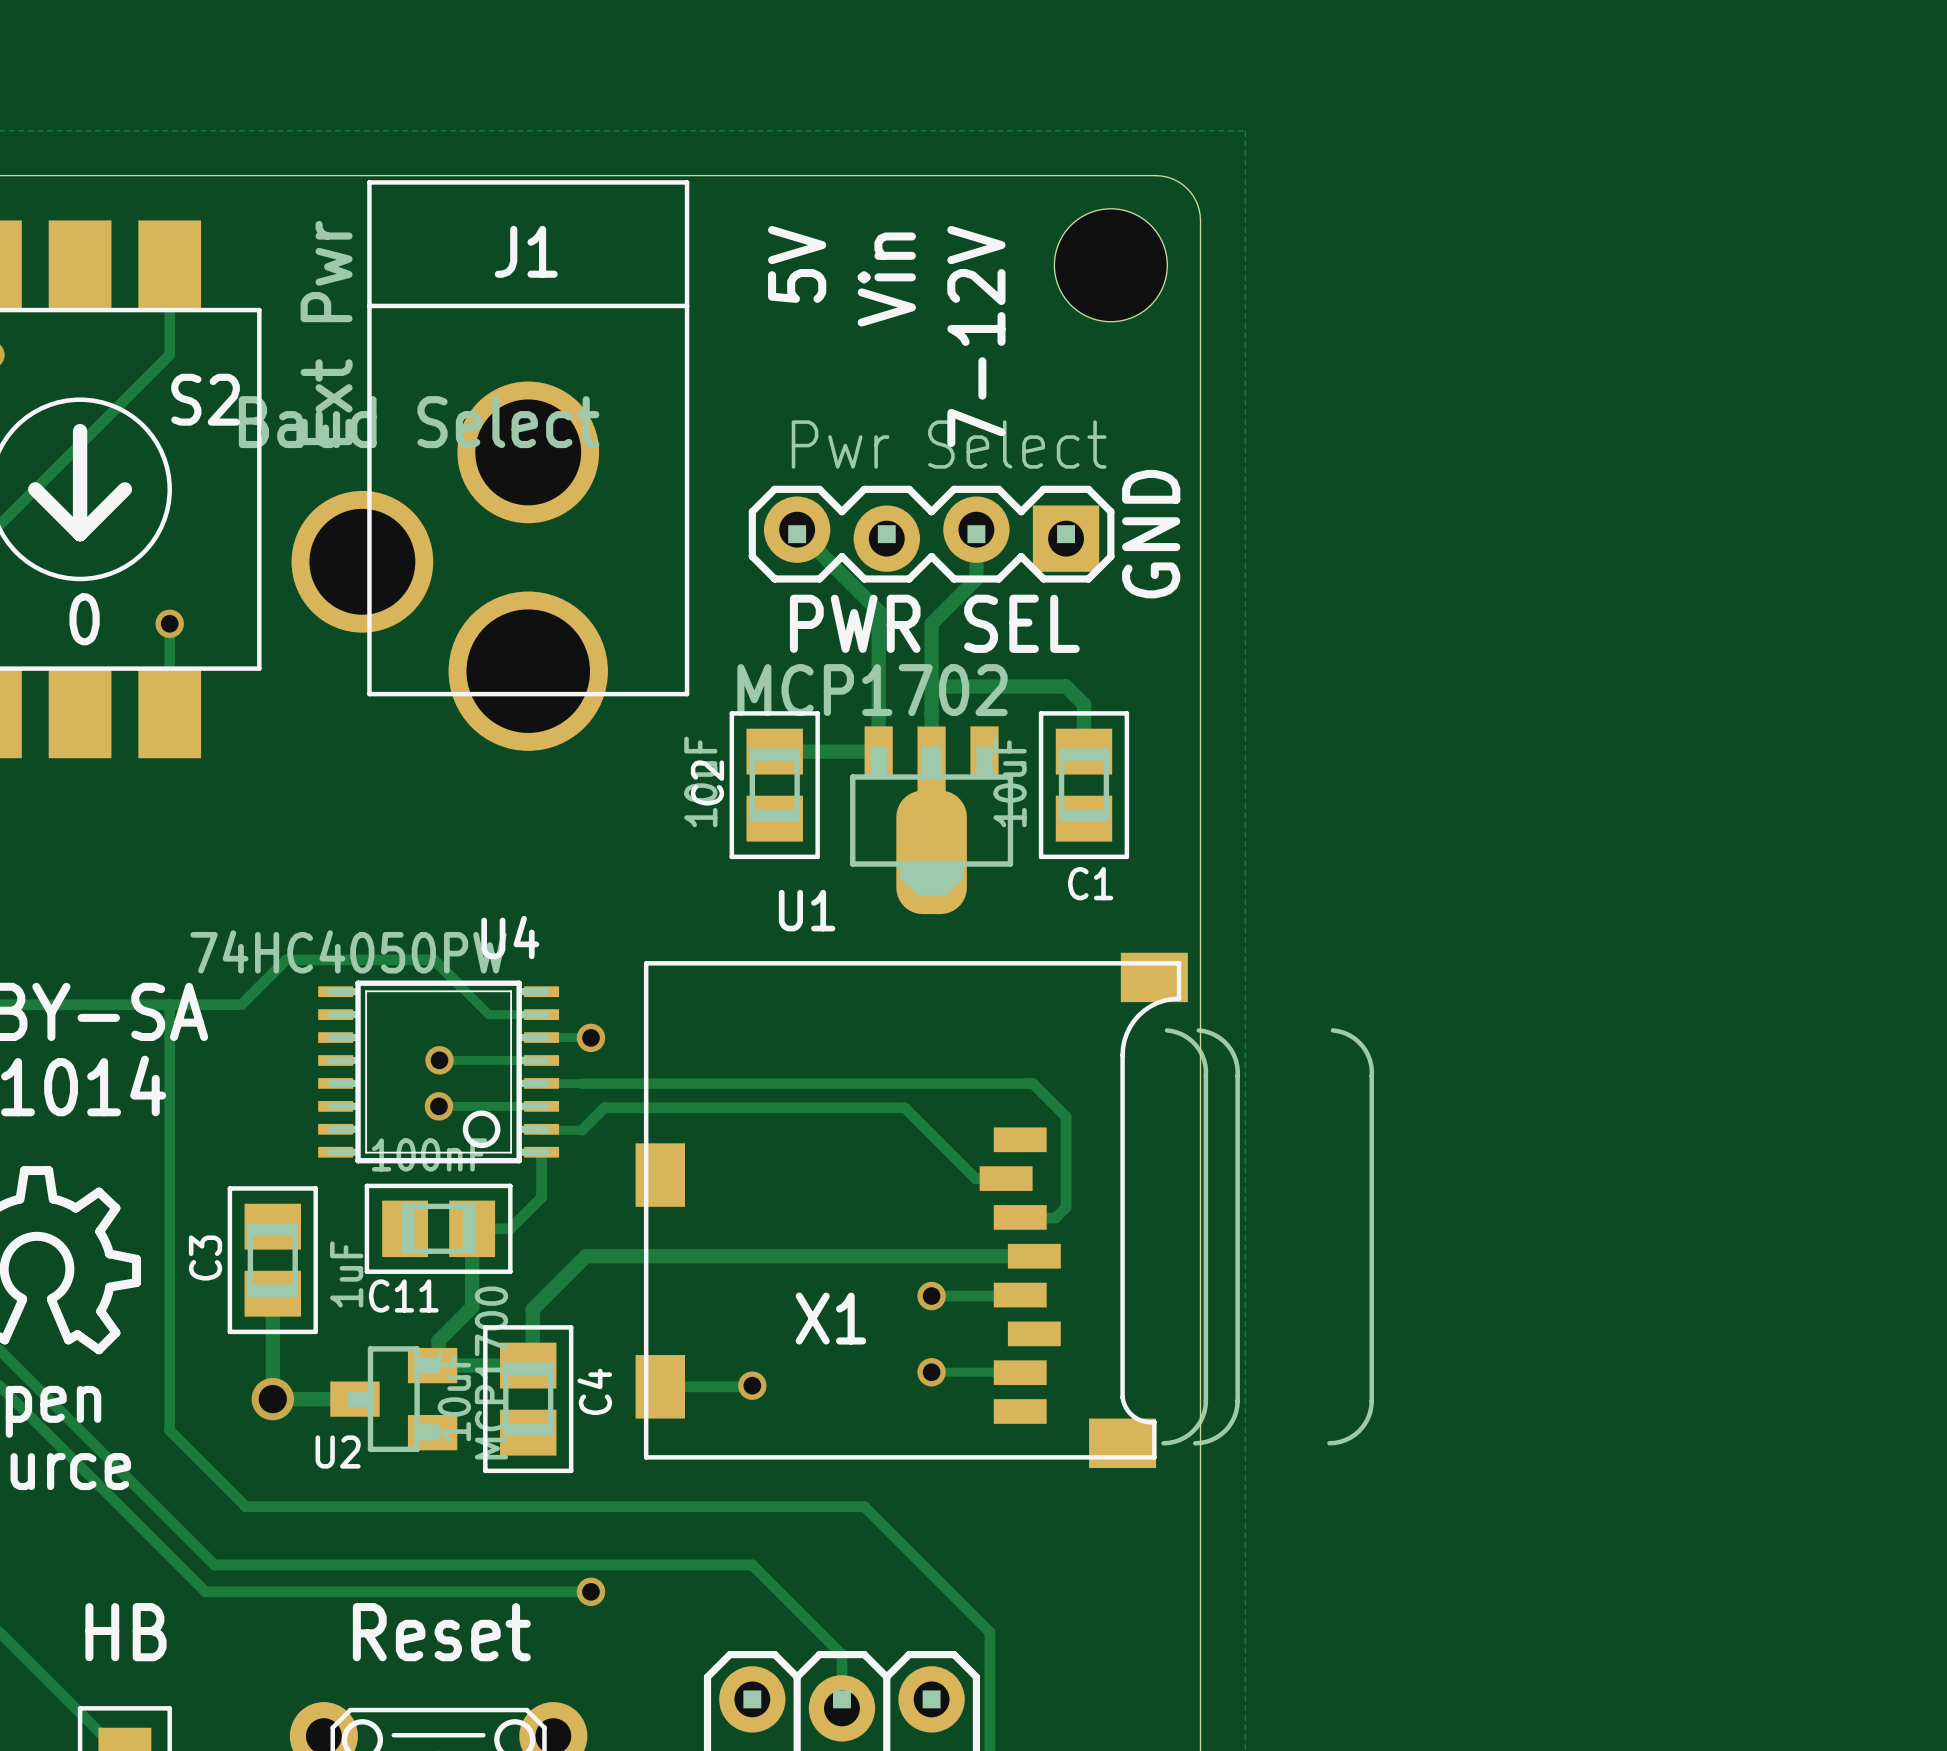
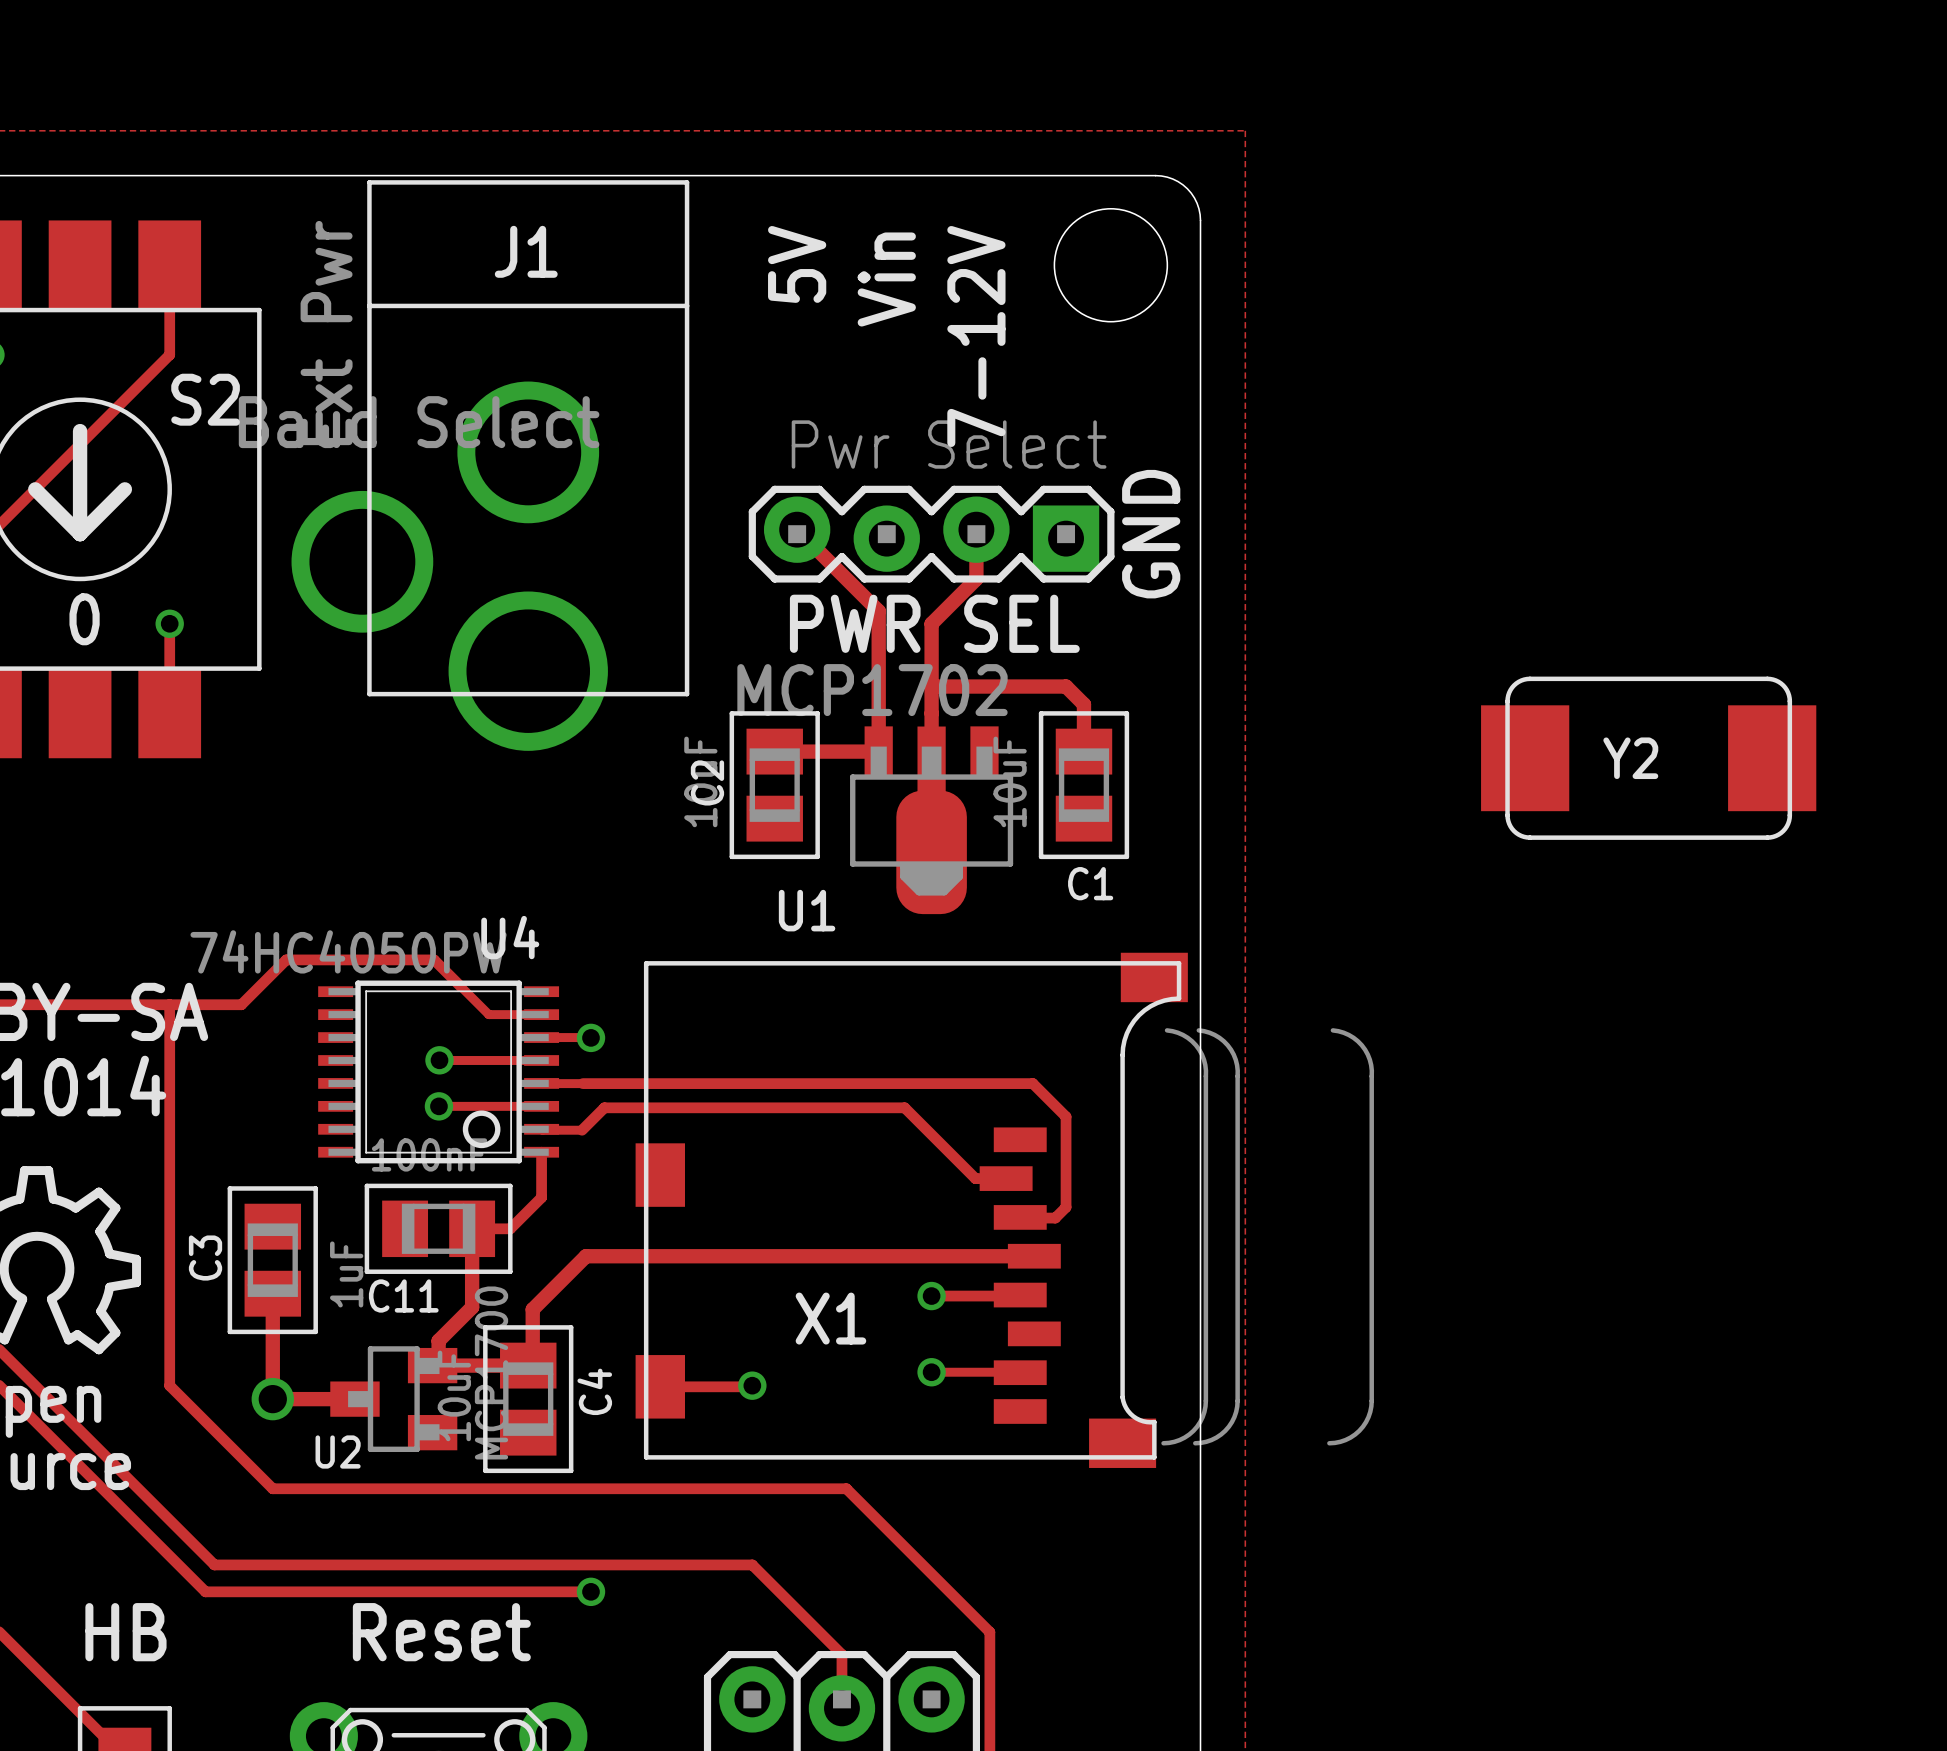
Y2: none -> (1648, 758)
track: (169, 1385) (169, 1430) (245, 1506) (864, 1506) -> (169, 1385) (272, 1488) (846, 1488) (864, 1506)

